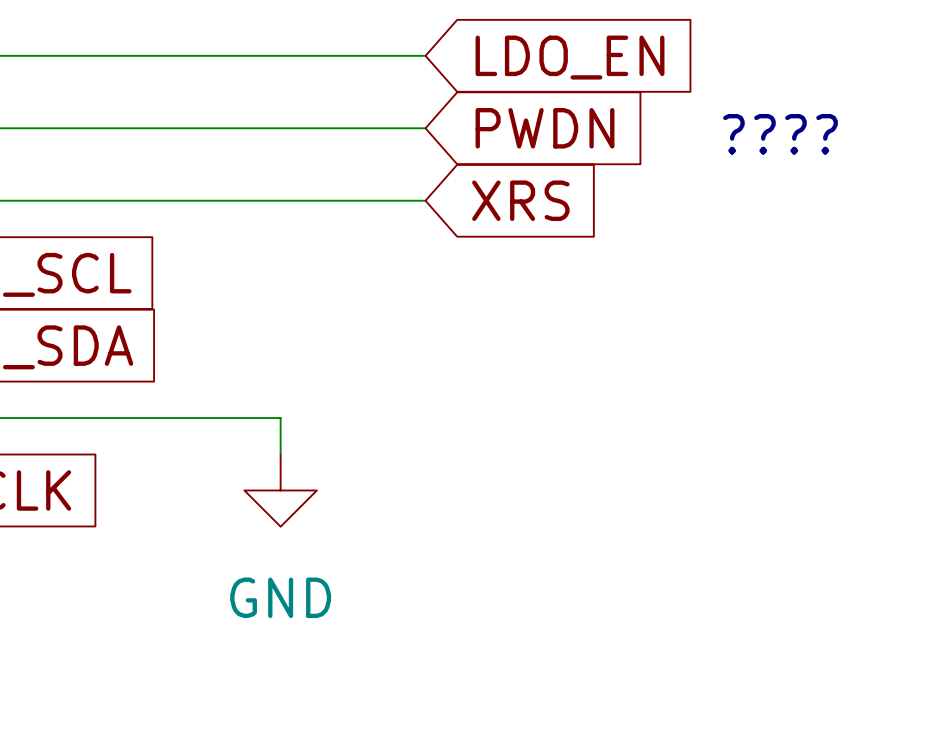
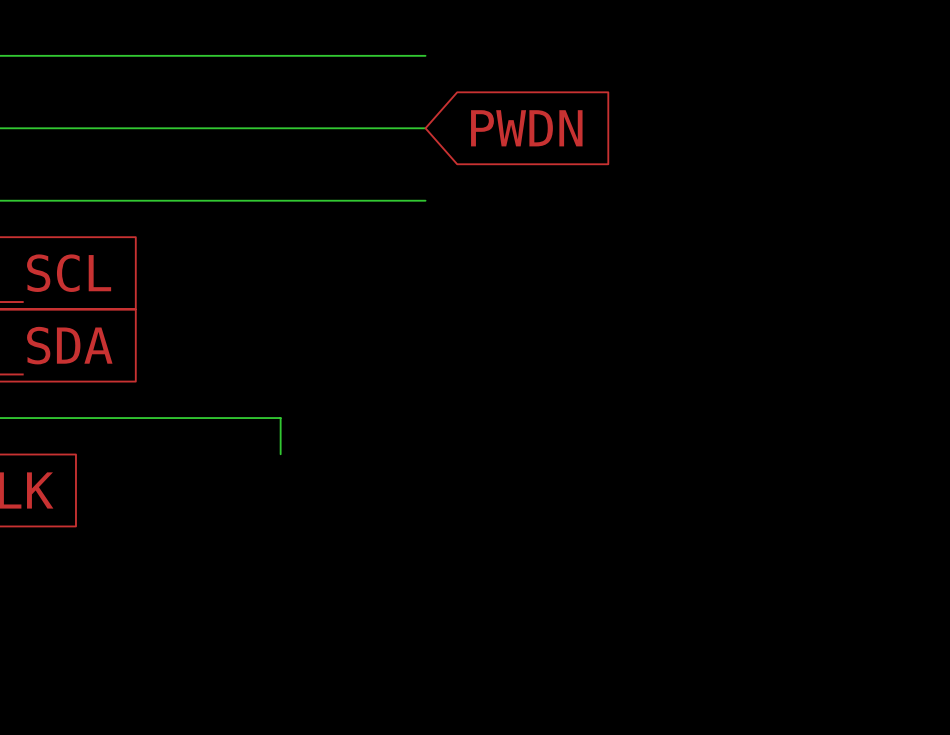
global label: LDO_EN (570, 57) -> none
text: ???? (780, 134) -> none
global label: XRS (520, 200) -> none
power symbol: GND (280, 490) -> none

